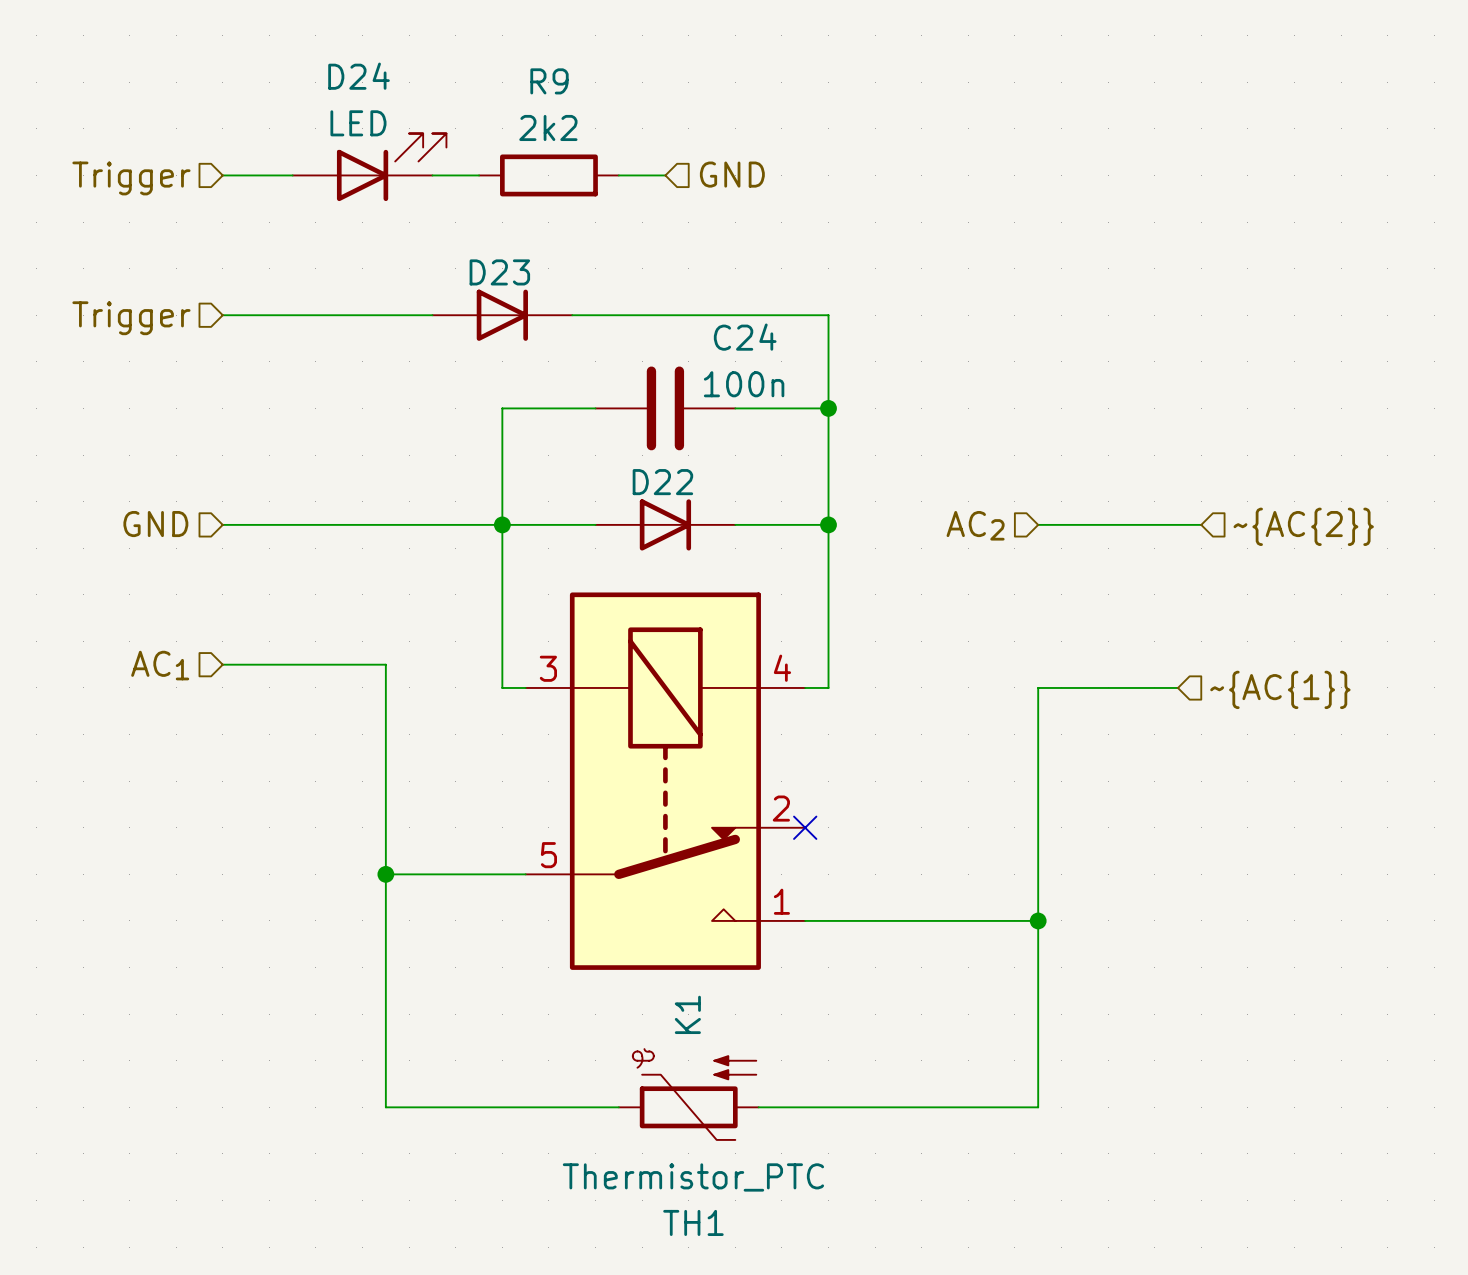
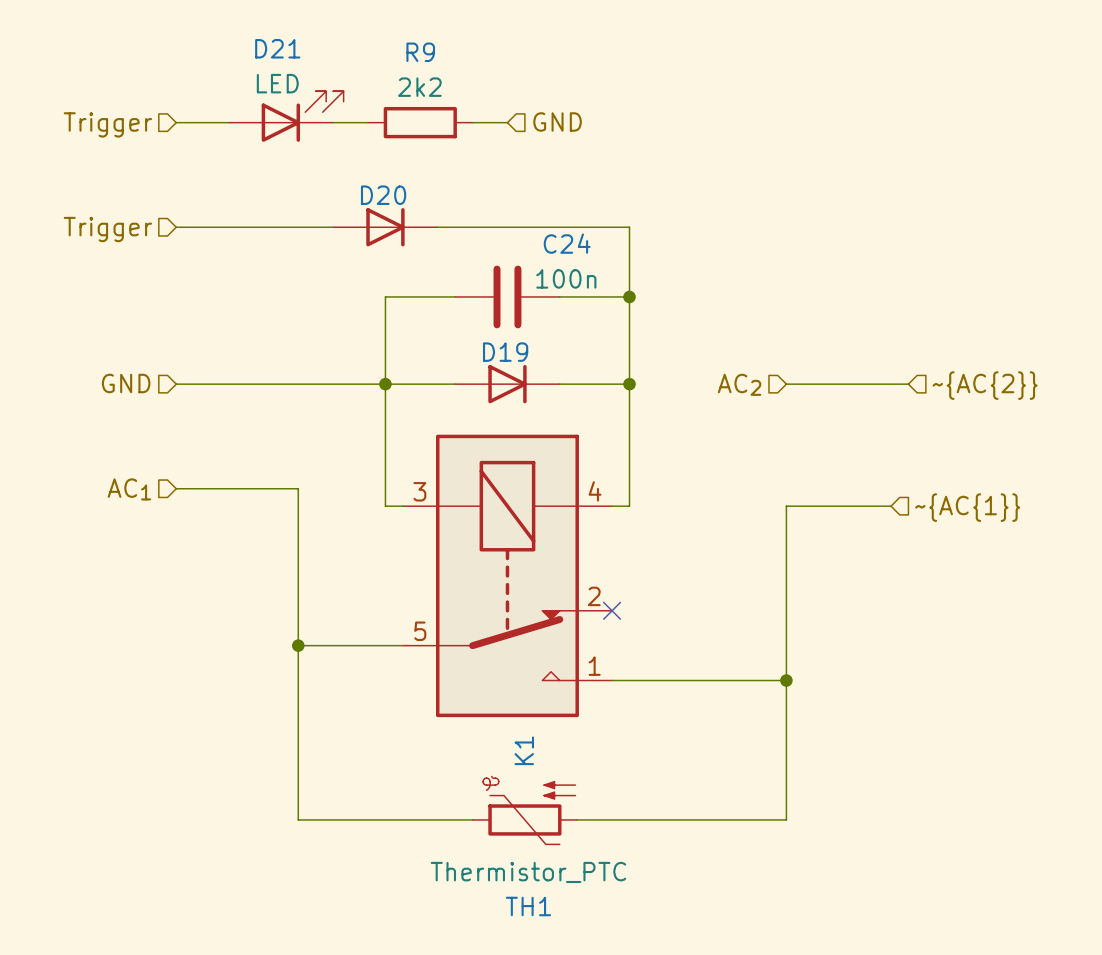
D24 name: D24 (359, 76) -> D21 (277, 48)
D23 name: D23 (499, 272) -> D20 (383, 195)
D22 name: D22 (662, 482) -> D19 (505, 352)

